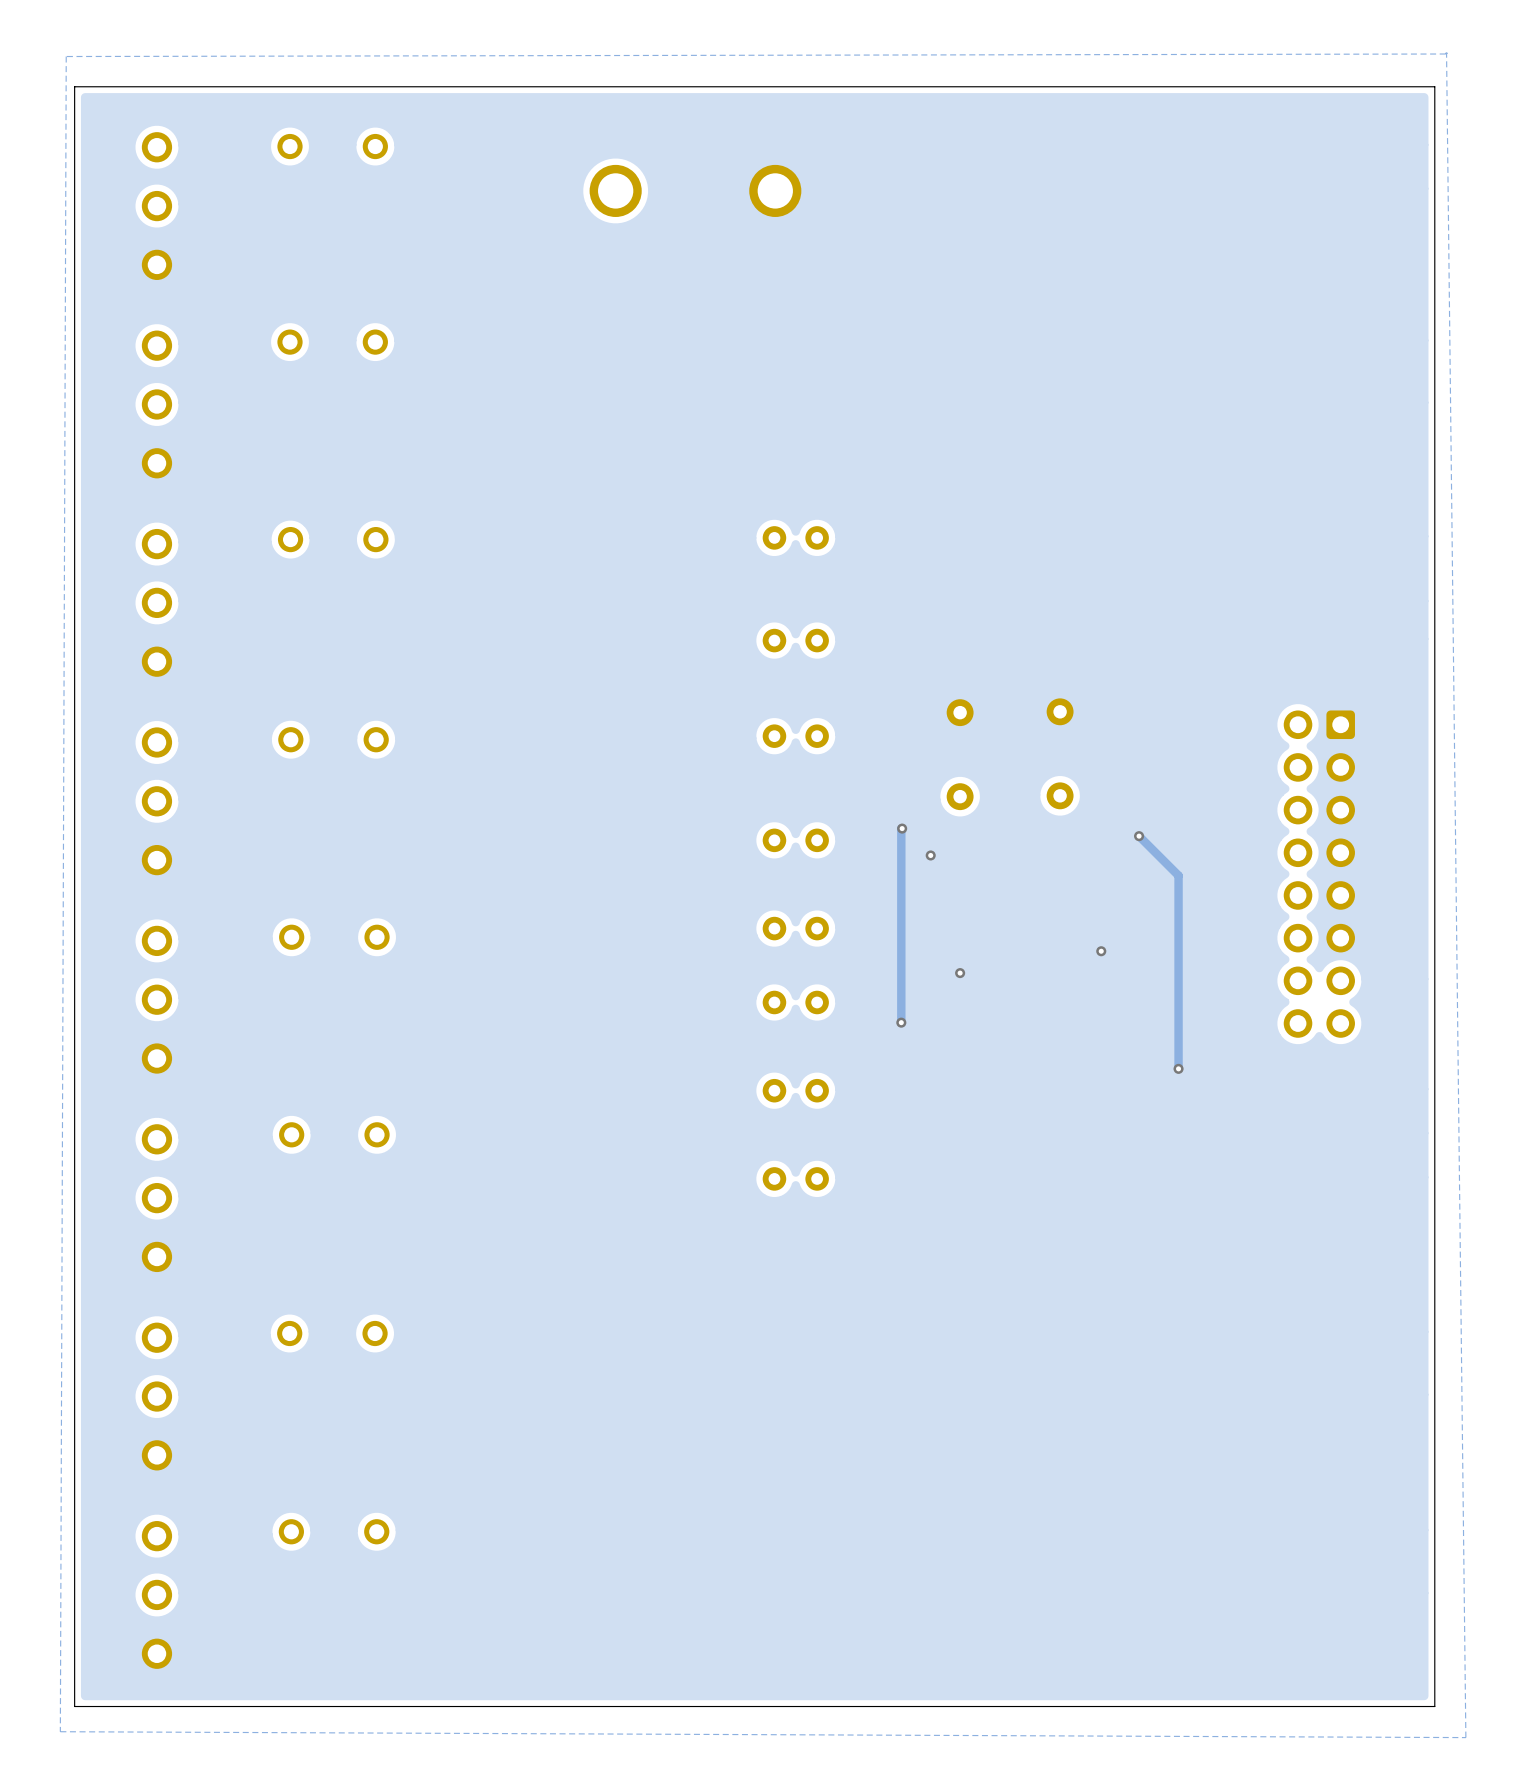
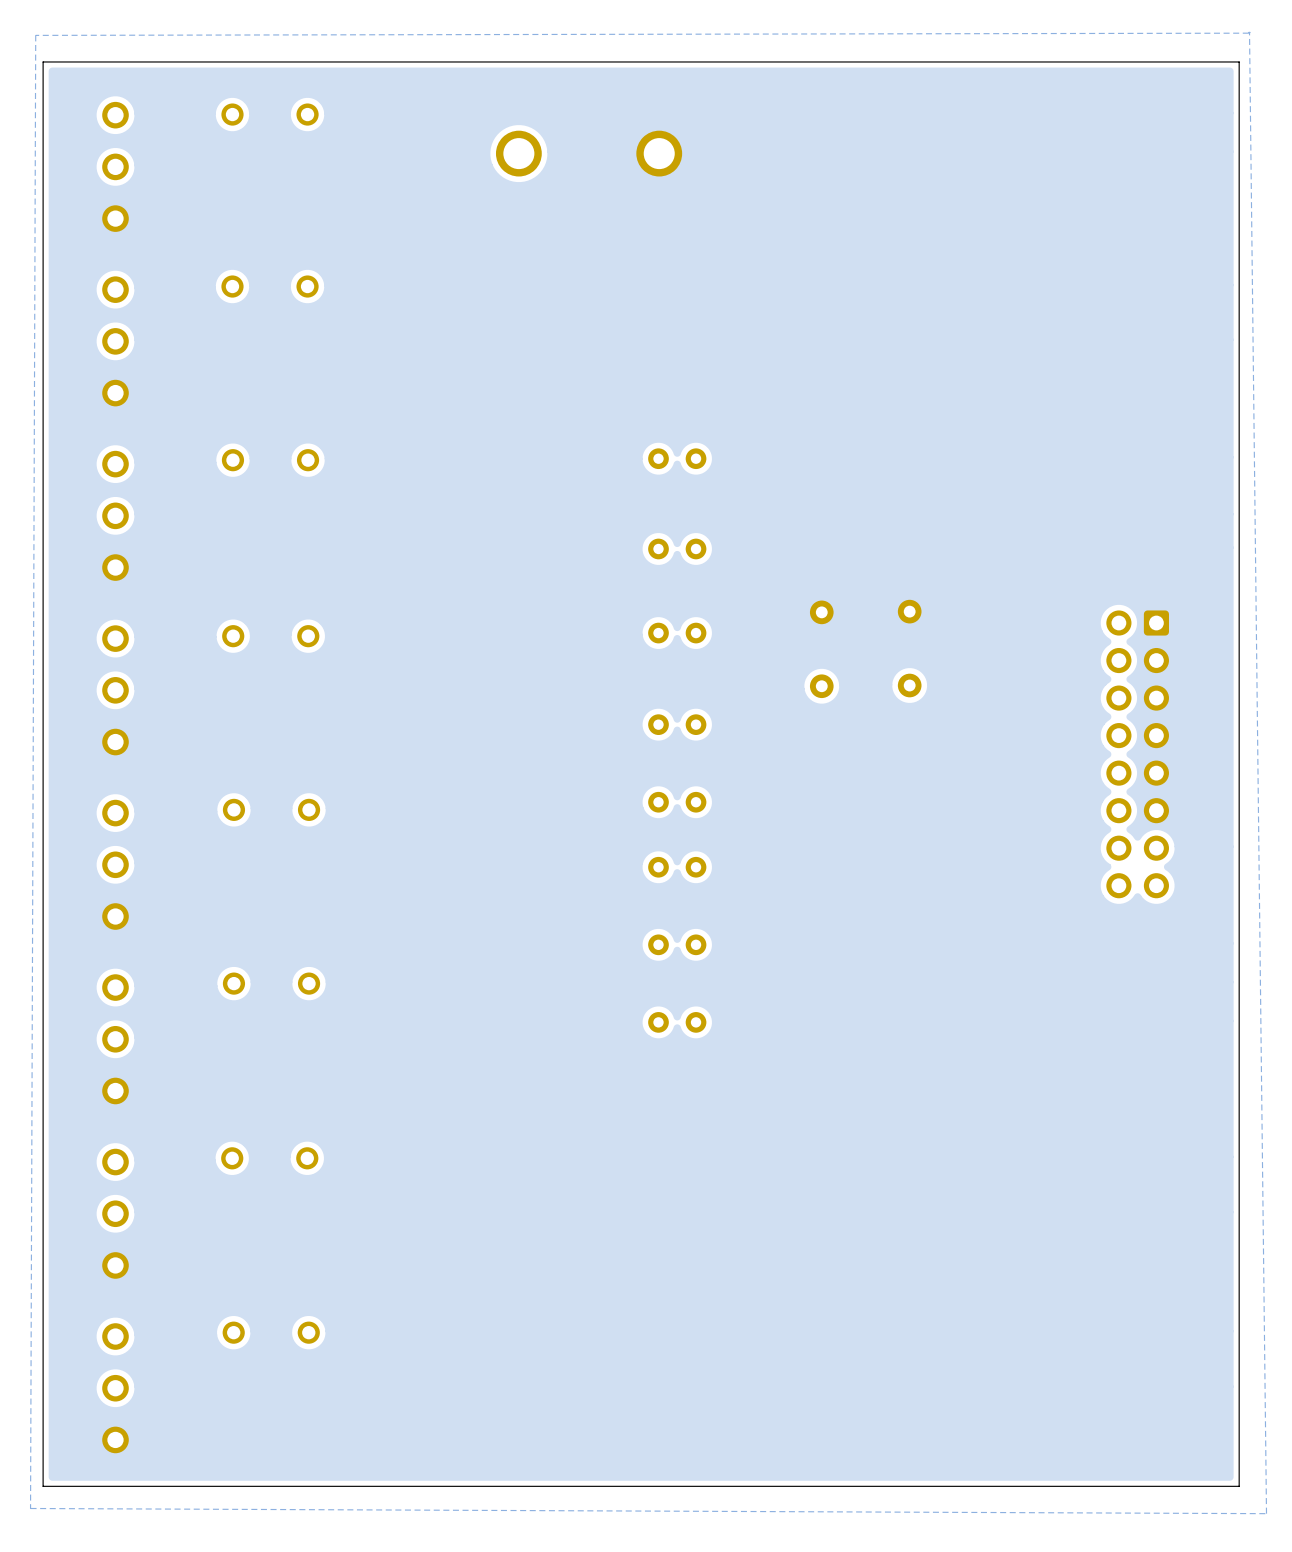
track: (902, 828) (901, 1022) -> none
via: (902, 828) -> none
track: (1139, 836) (1178, 875) (1178, 1068) -> none
via: (1139, 836) -> none
via: (930, 855) -> none
via: (1101, 951) -> none
via: (960, 973) -> none
via: (901, 1022) -> none
via: (1178, 1068) -> none

